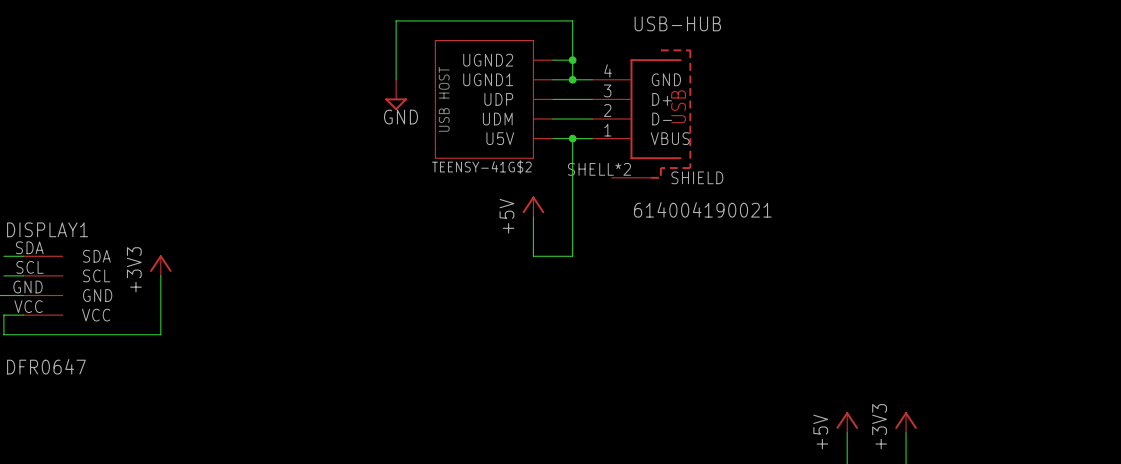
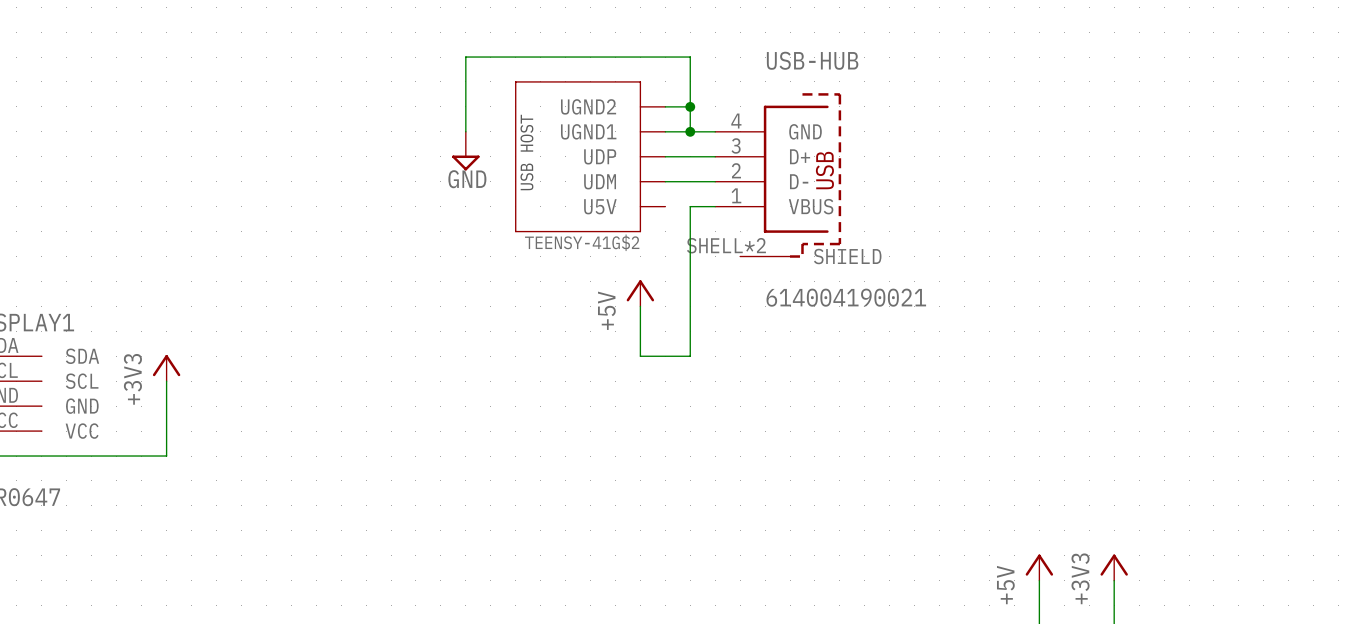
wire: (553, 138) (572, 138) -> none
junction: (572, 138) -> none

